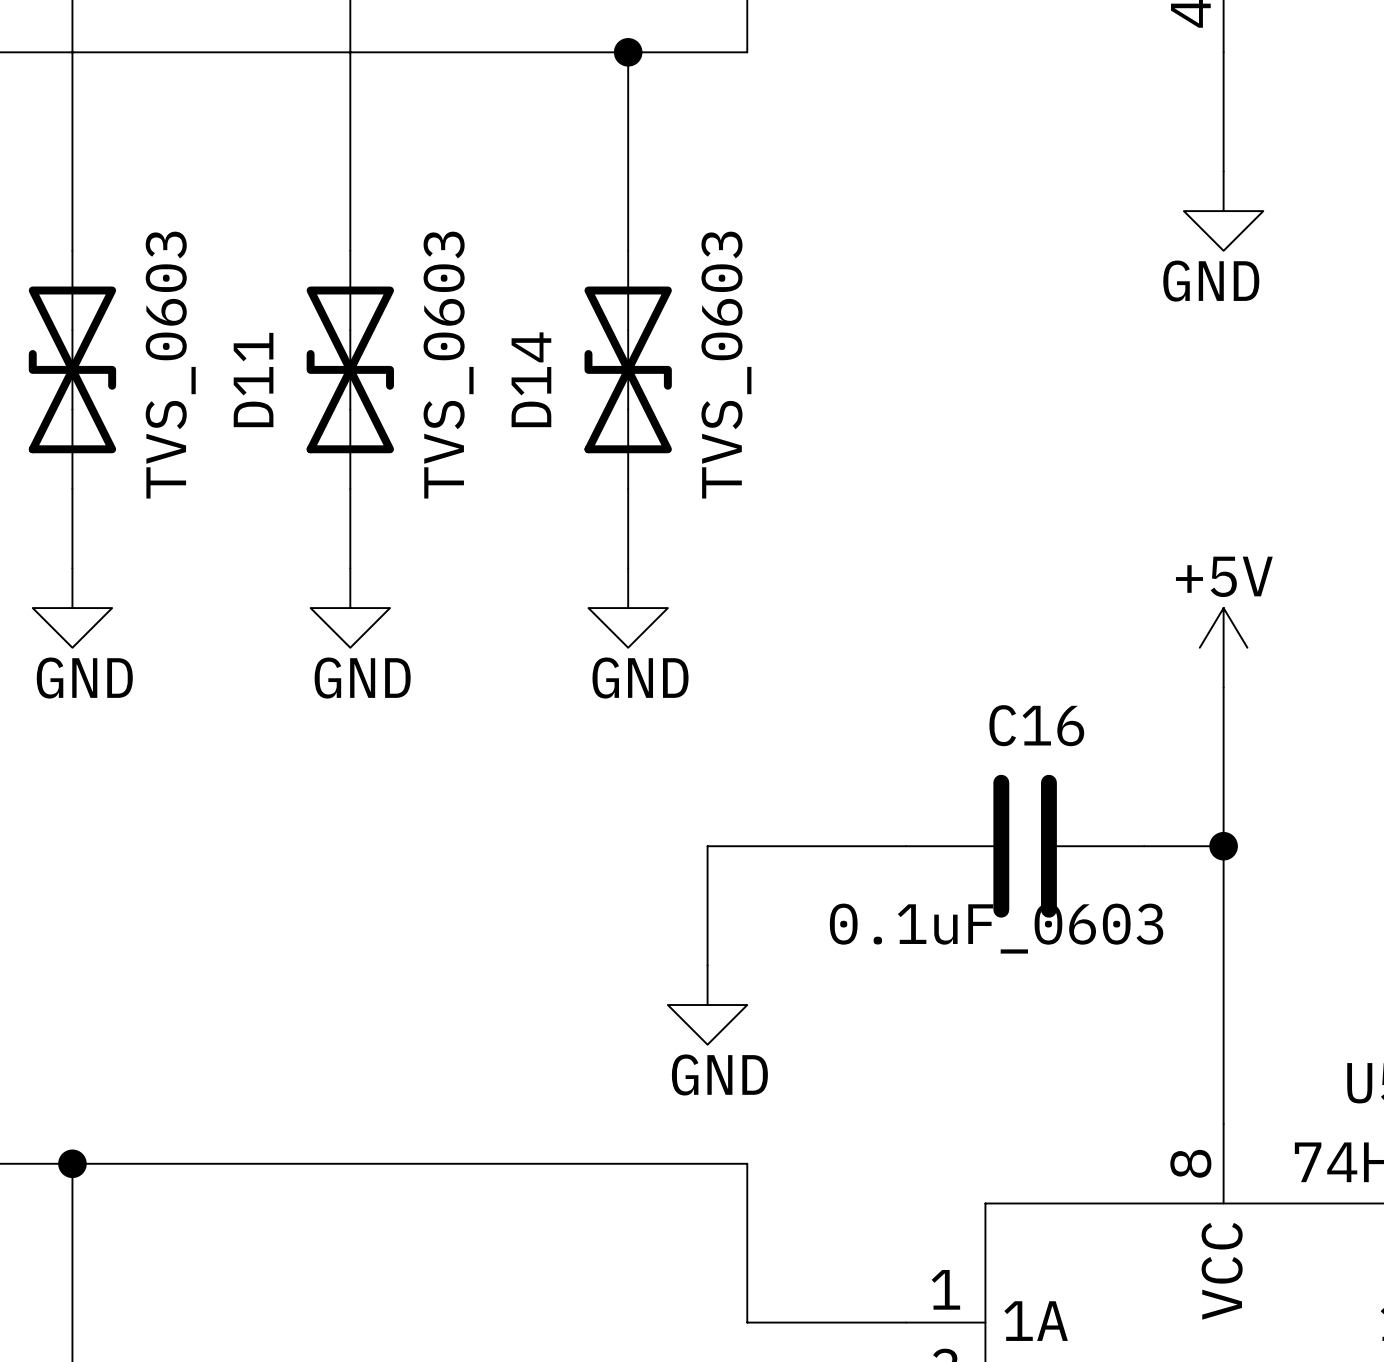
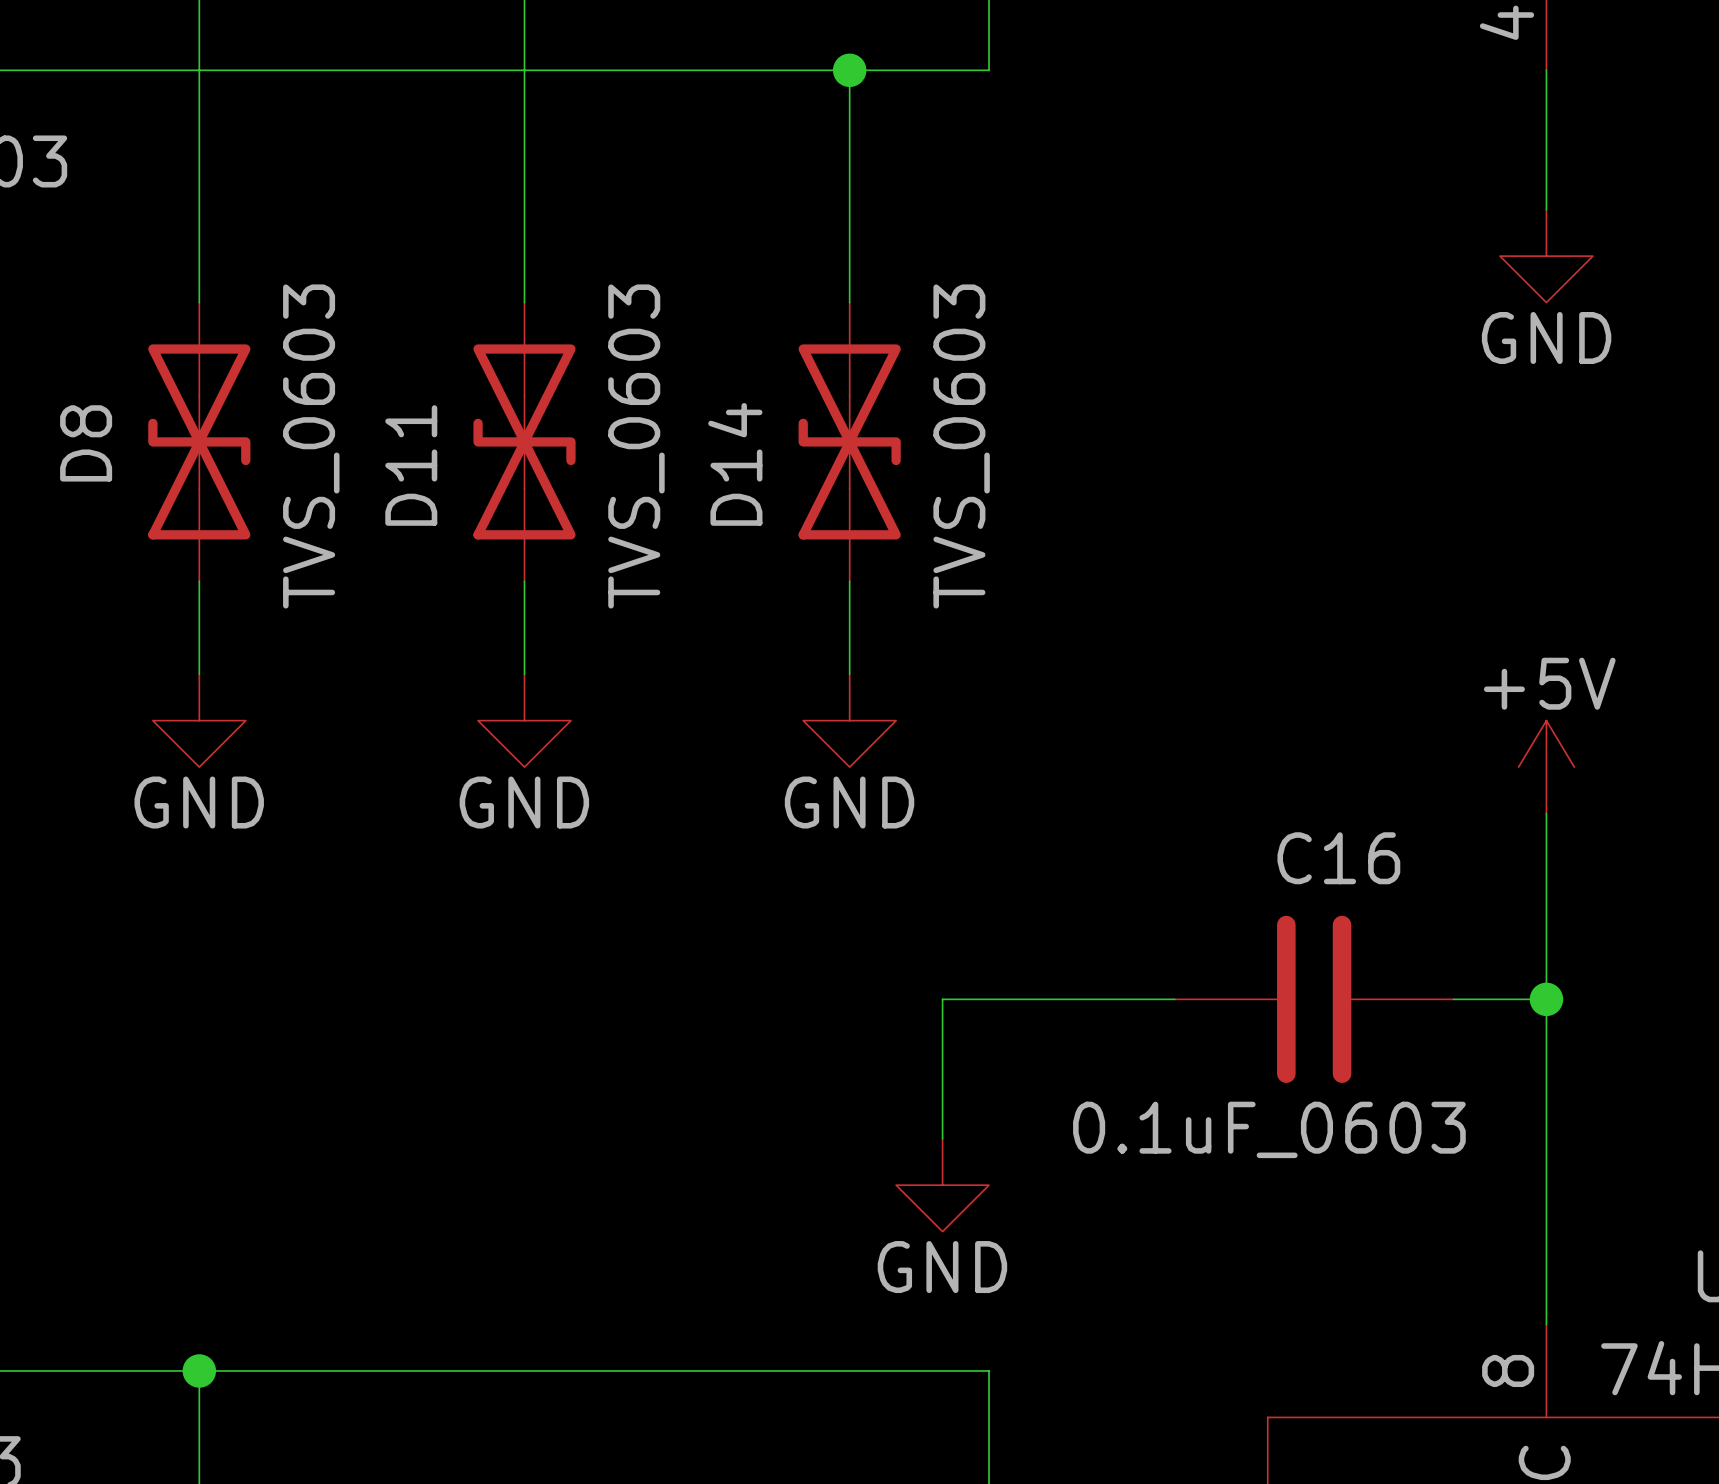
C16 value position: 0.1uF_0603 (996, 928) -> 0.1uF_0603 (1269, 1129)

